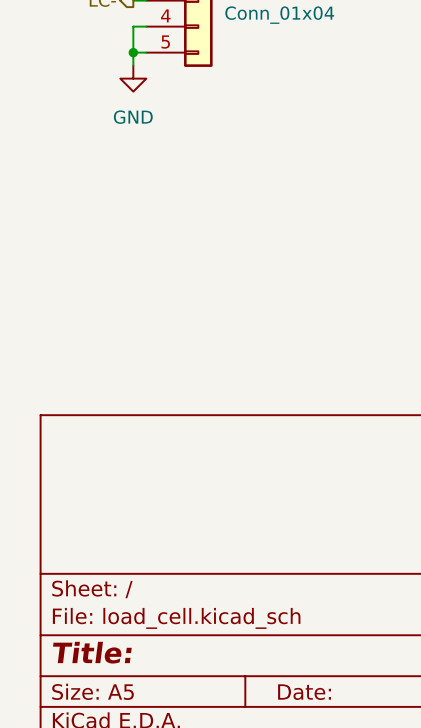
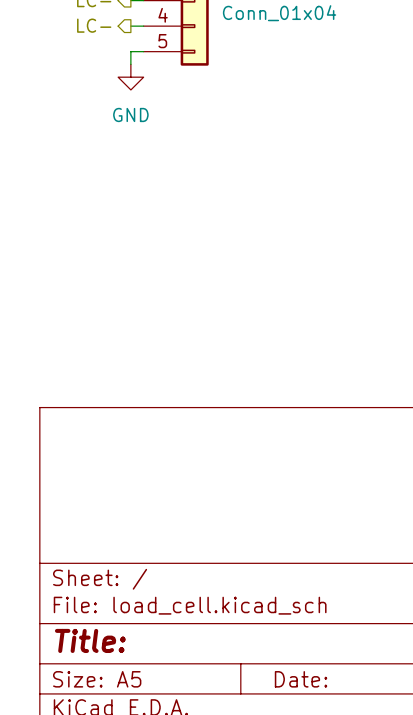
hierarchical label: none -> LC- (94, 25)
wire: (133, 26) (133, 52) -> none
junction: (133, 52) -> none

